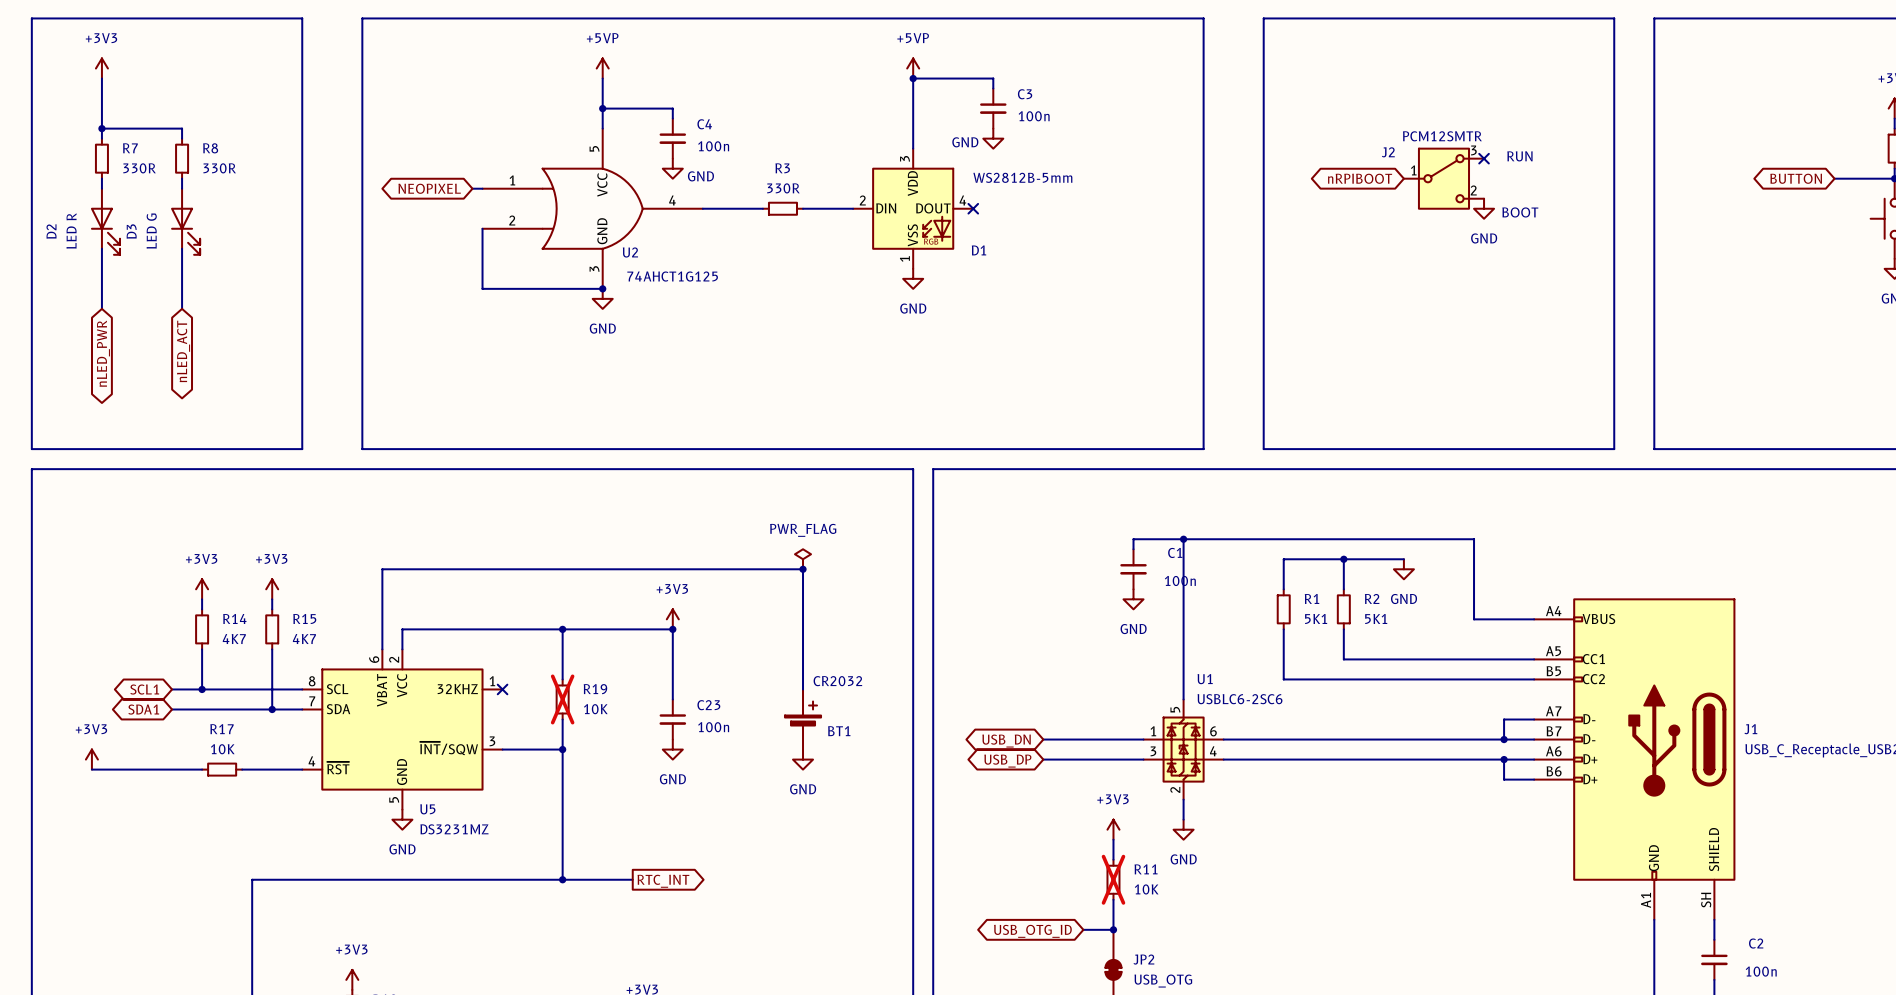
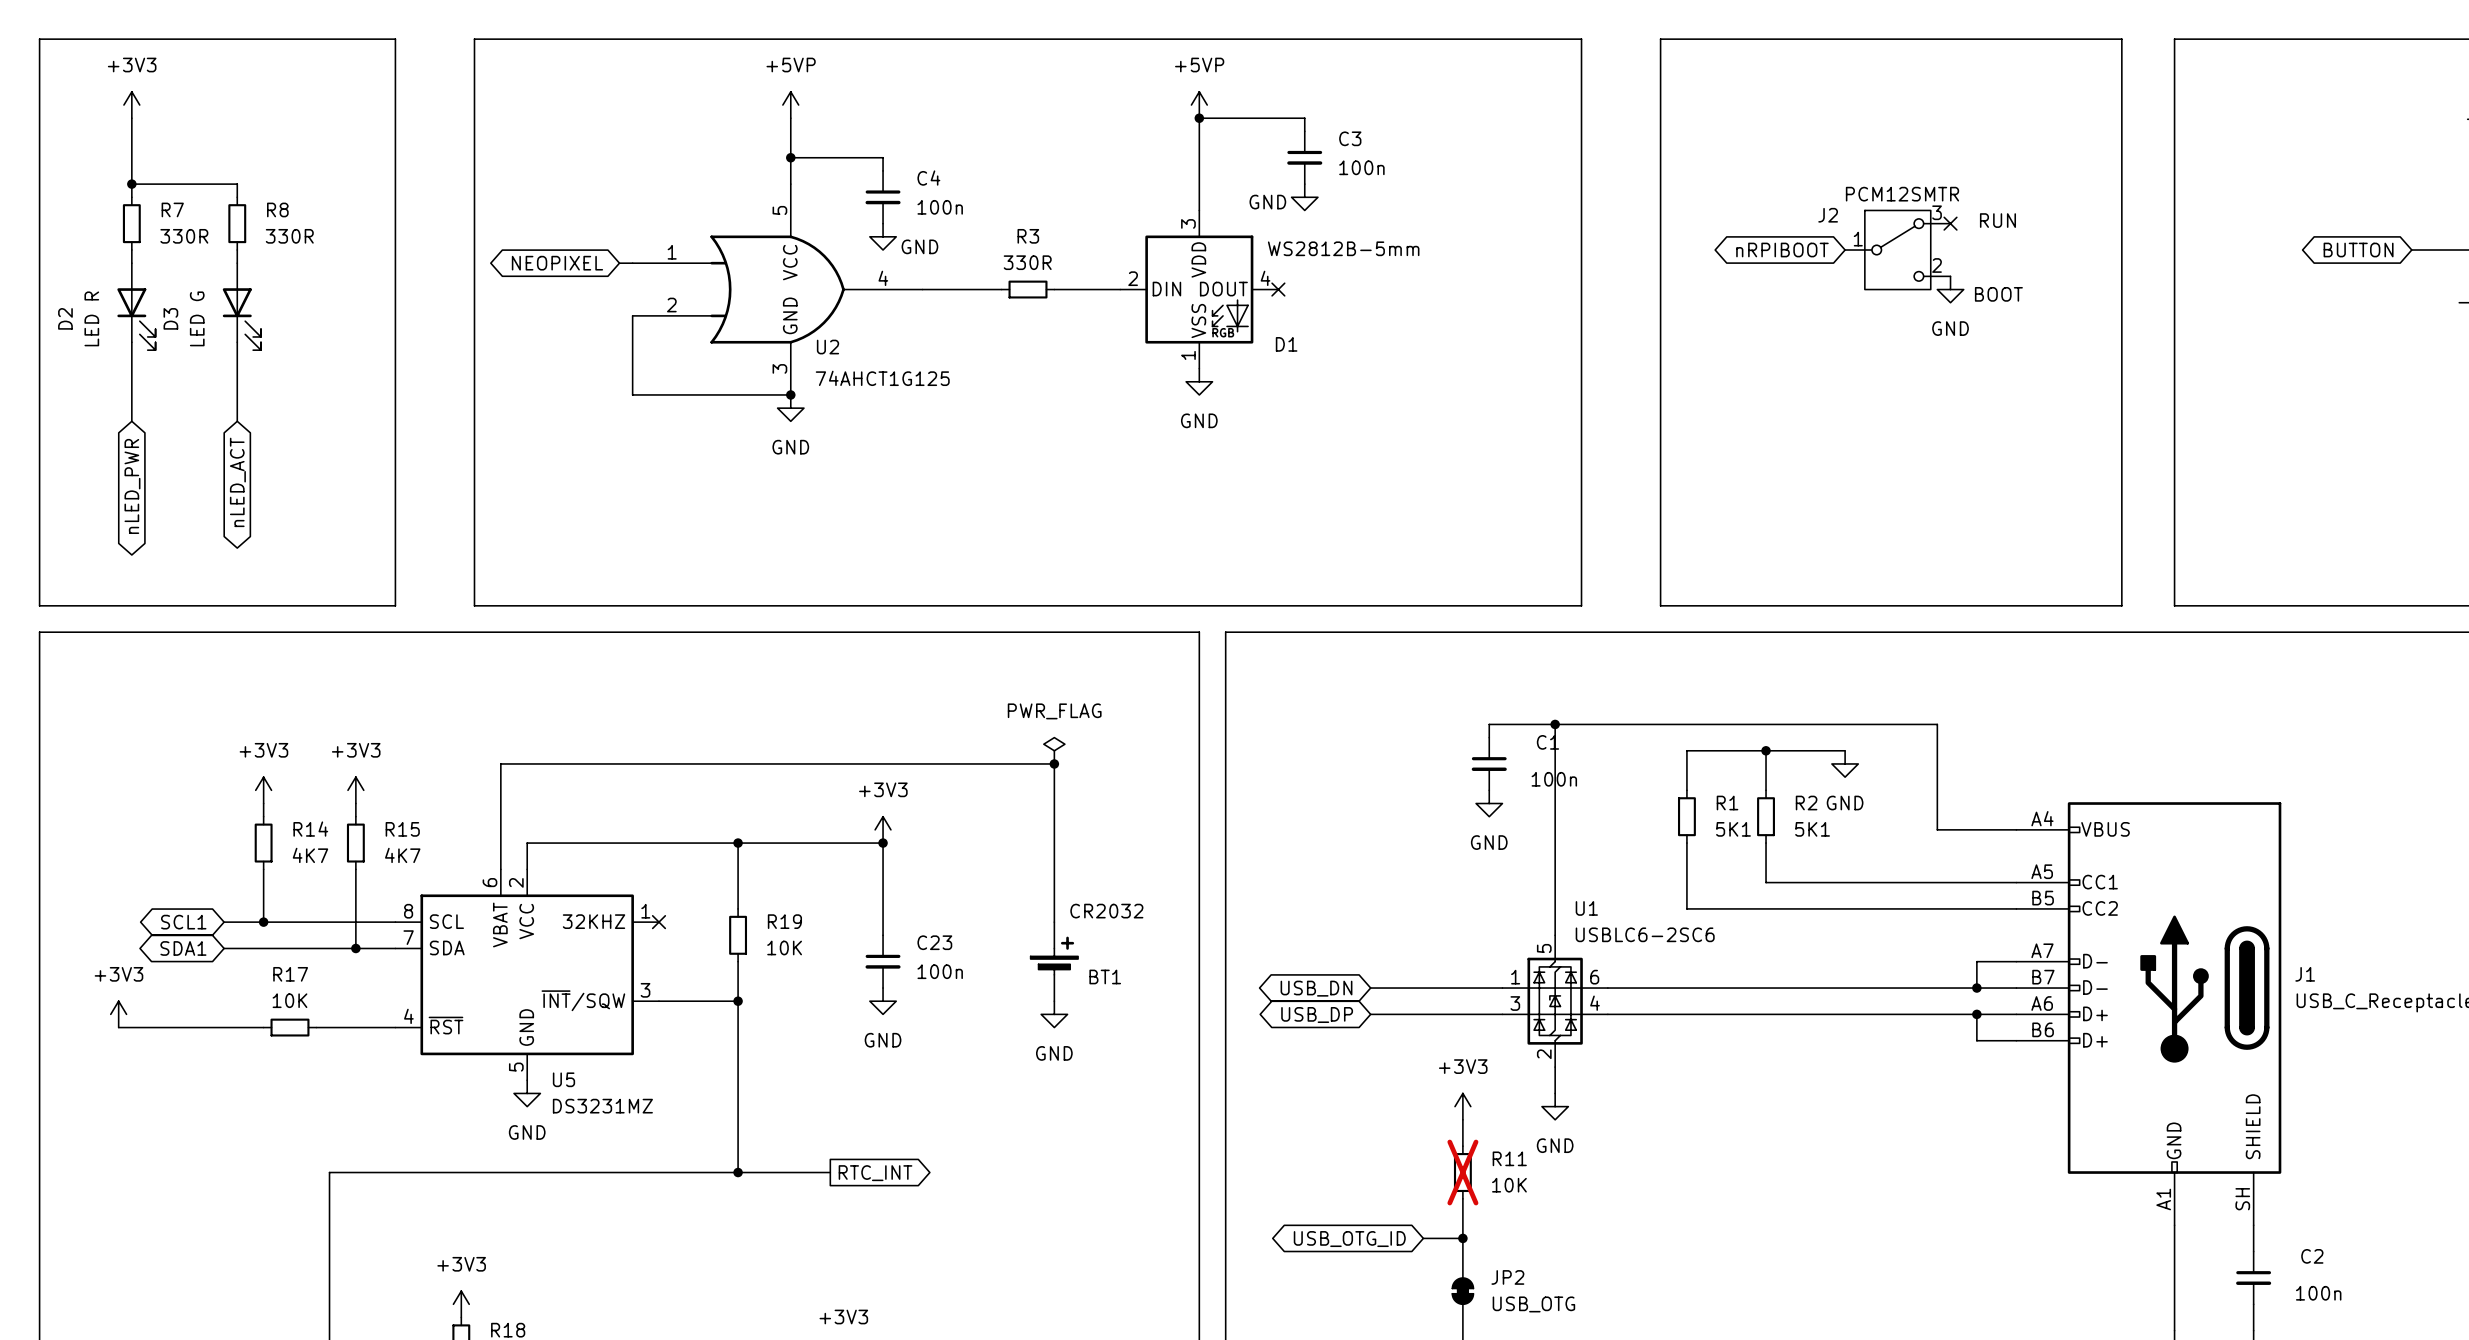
R19 do-not-place cross: (562, 699) -> none

